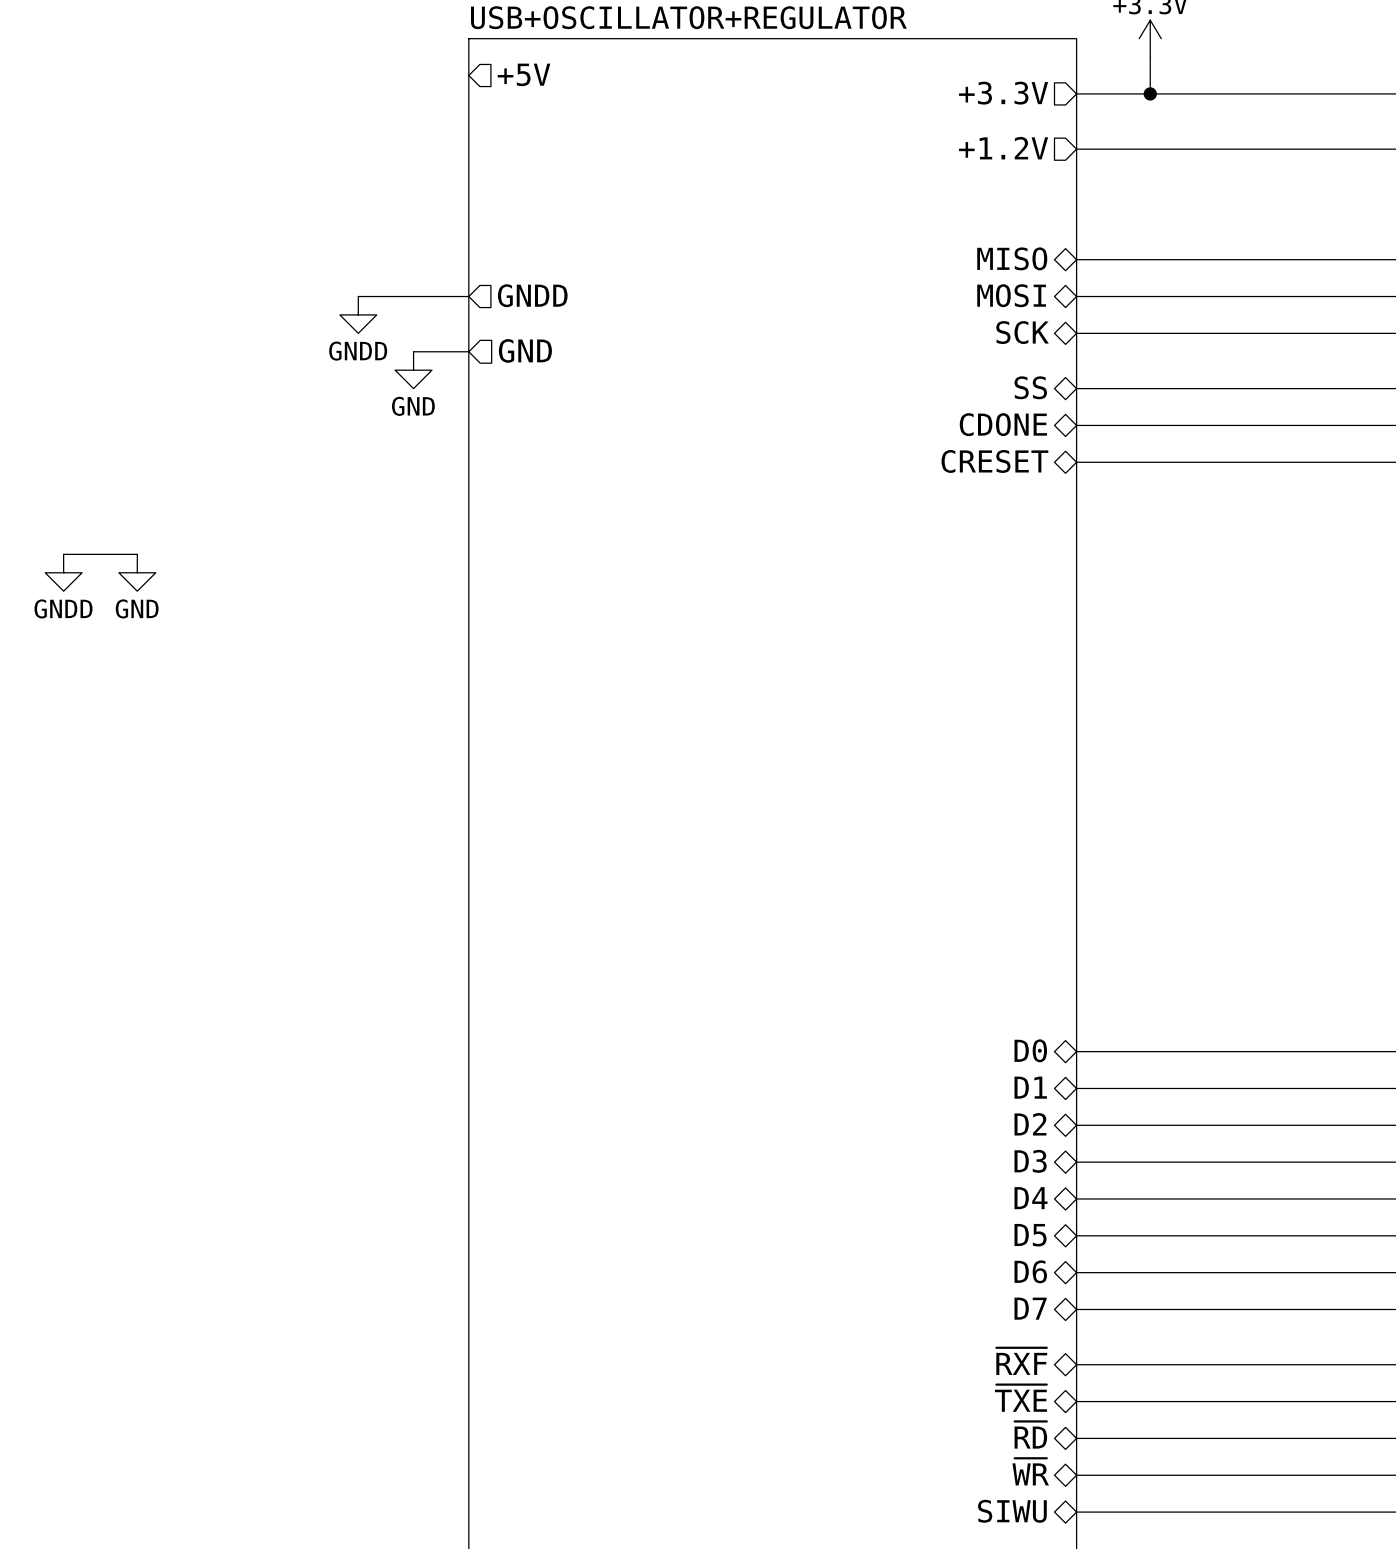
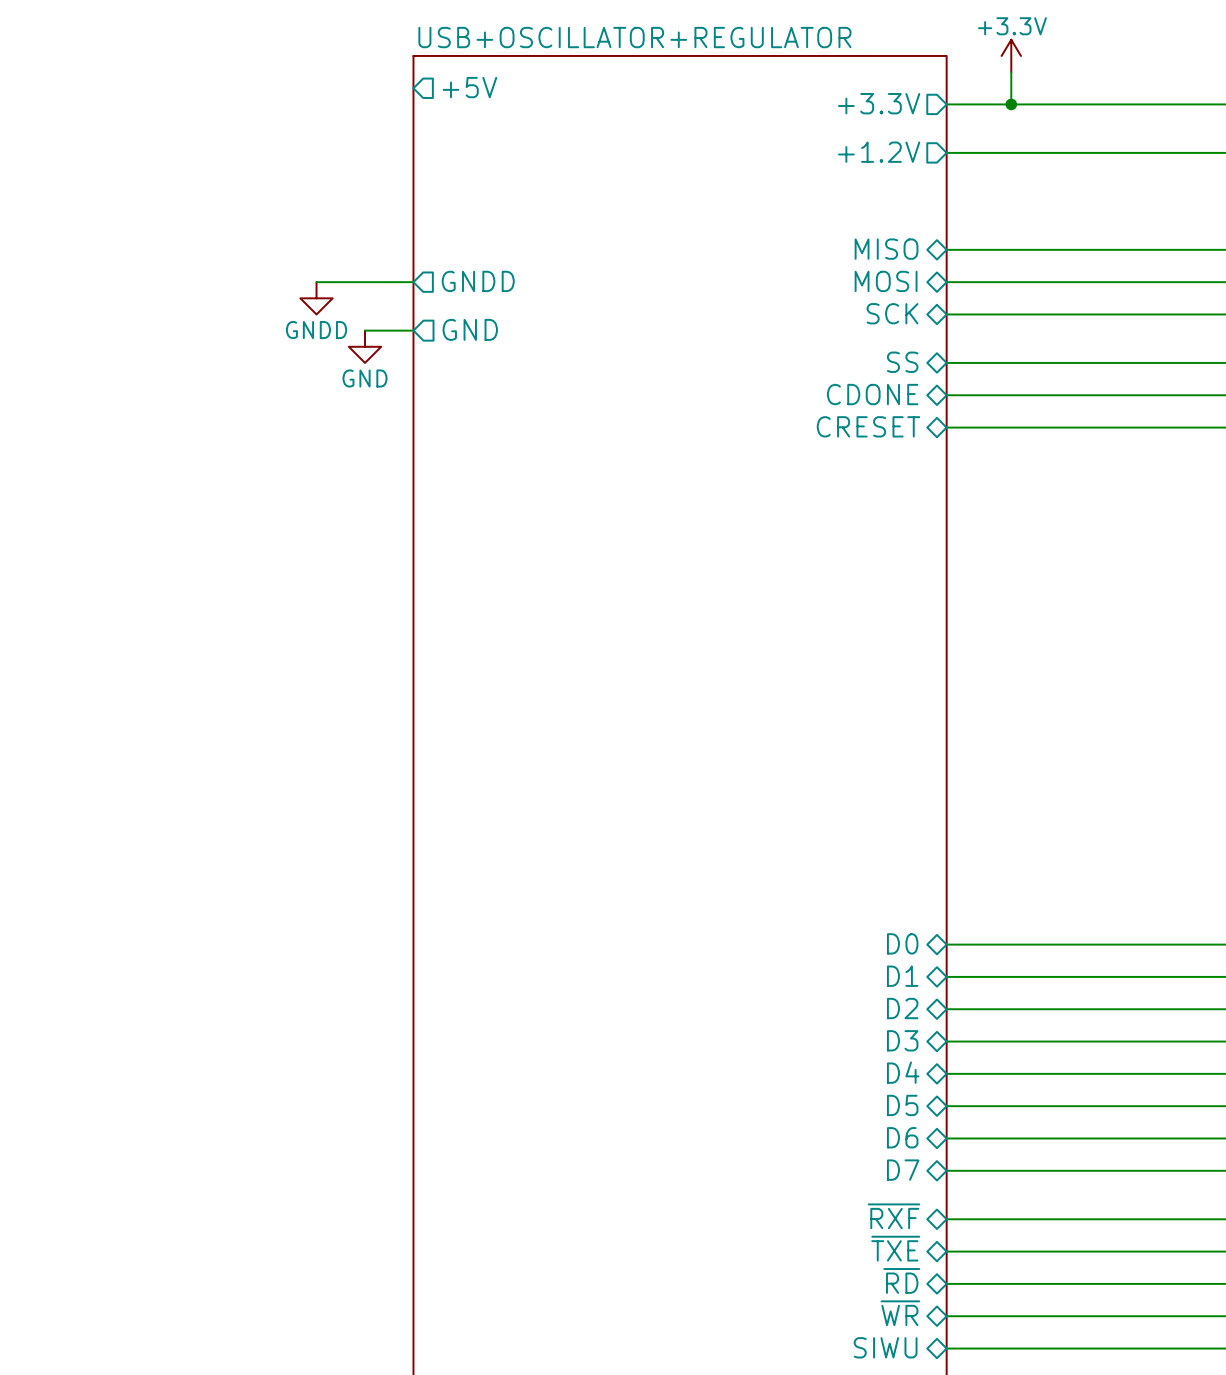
wire: (63, 554) (137, 554) -> none
power symbol: GNDD (63, 572) -> none
power symbol: GND (137, 572) -> none

